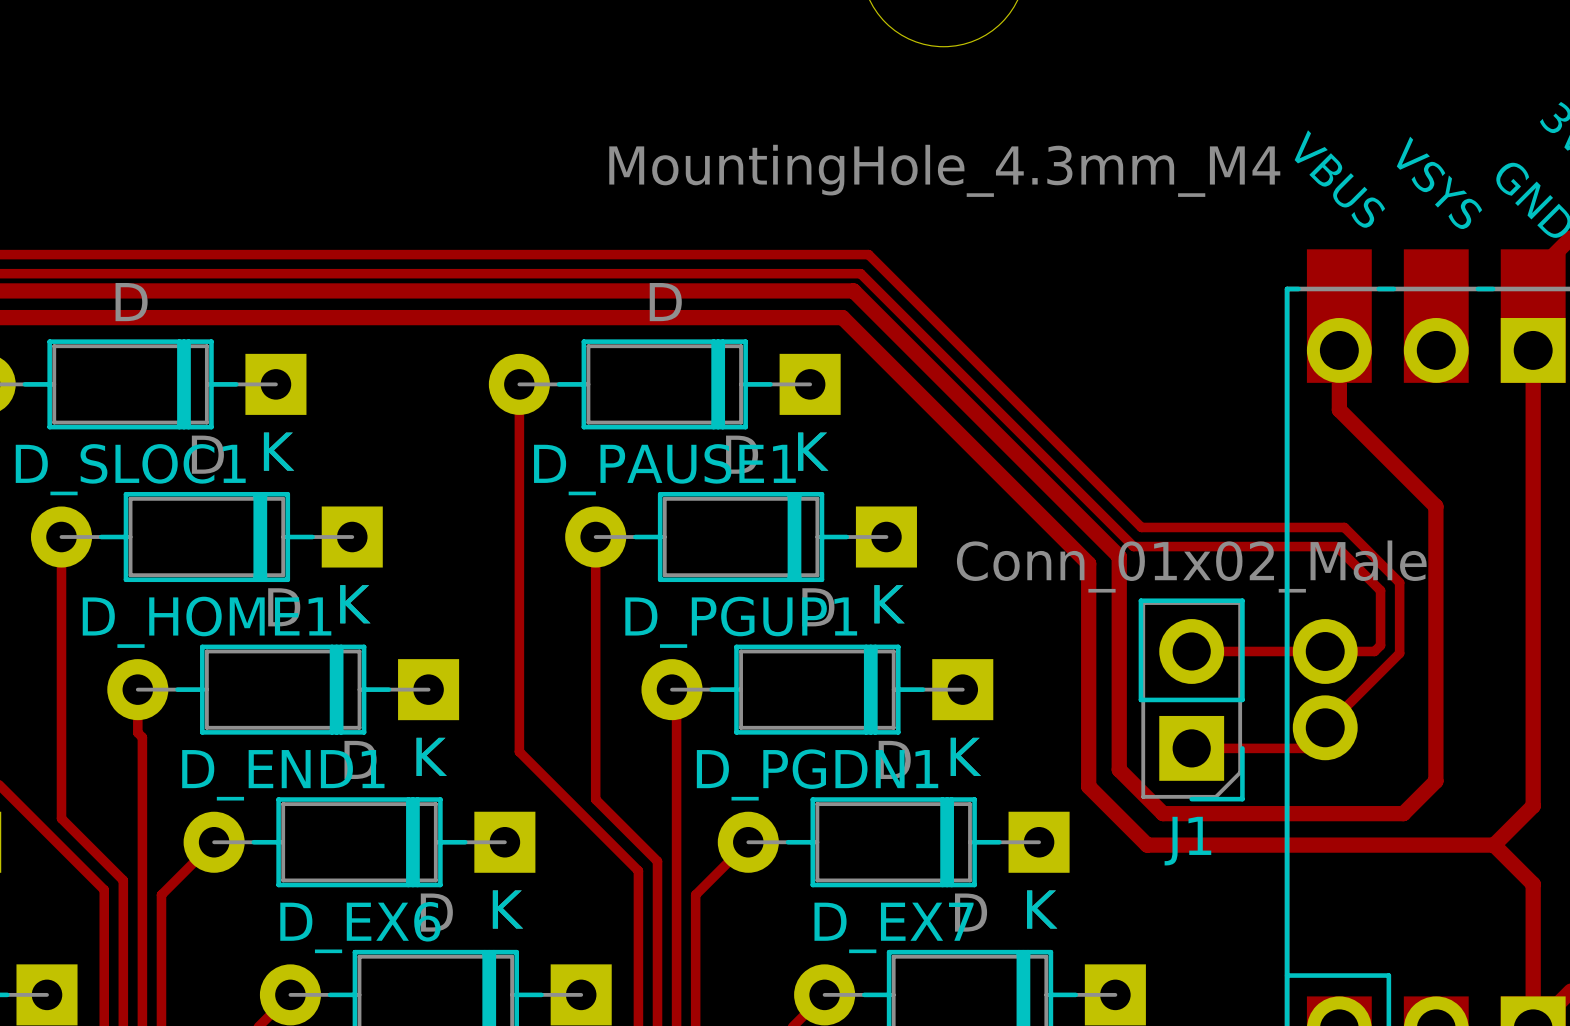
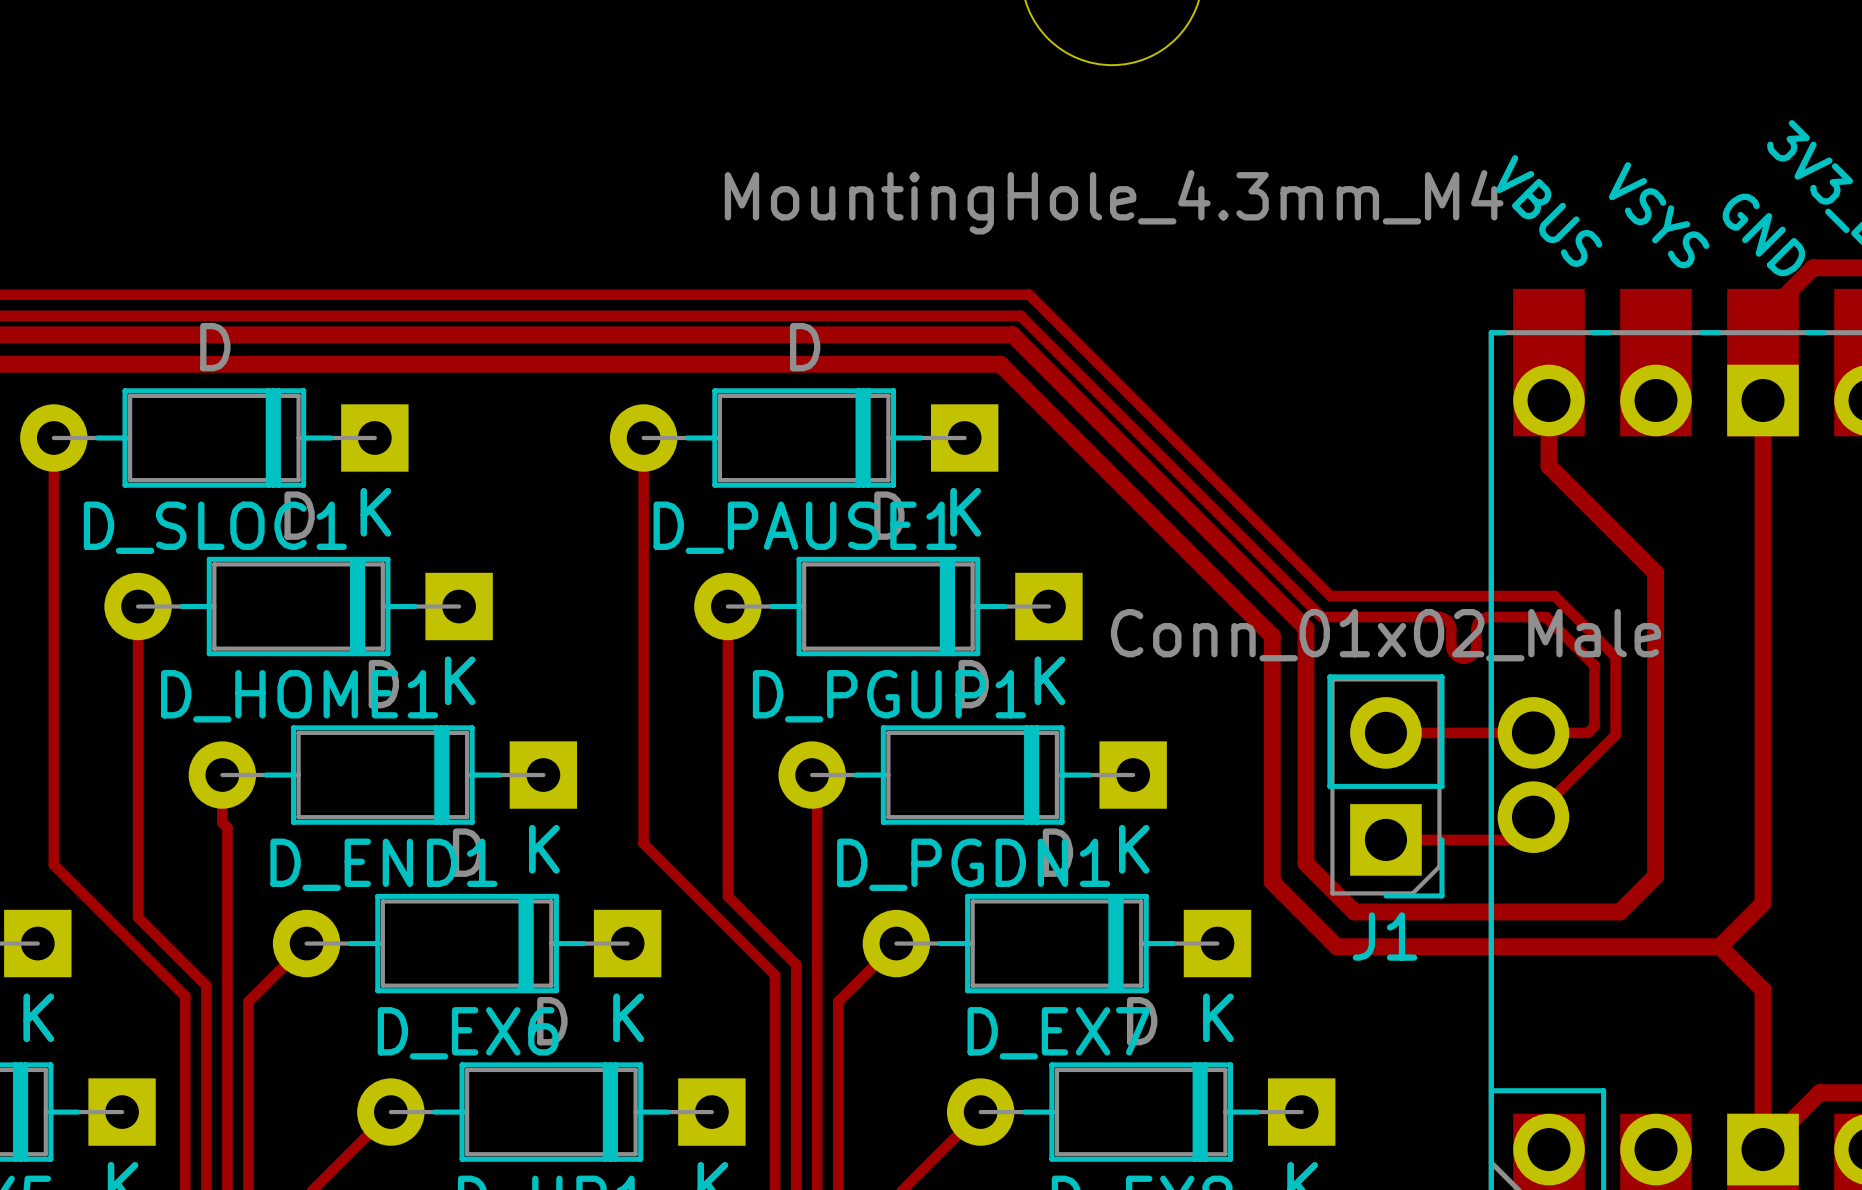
track: (1239, 546) (1285, 546) -> (1438, 617) (1446, 619) (1450, 624) (1452, 652) (1457, 656) (1463, 658) (1471, 655) (1475, 650) (1478, 623) (1482, 618) (1489, 617)

